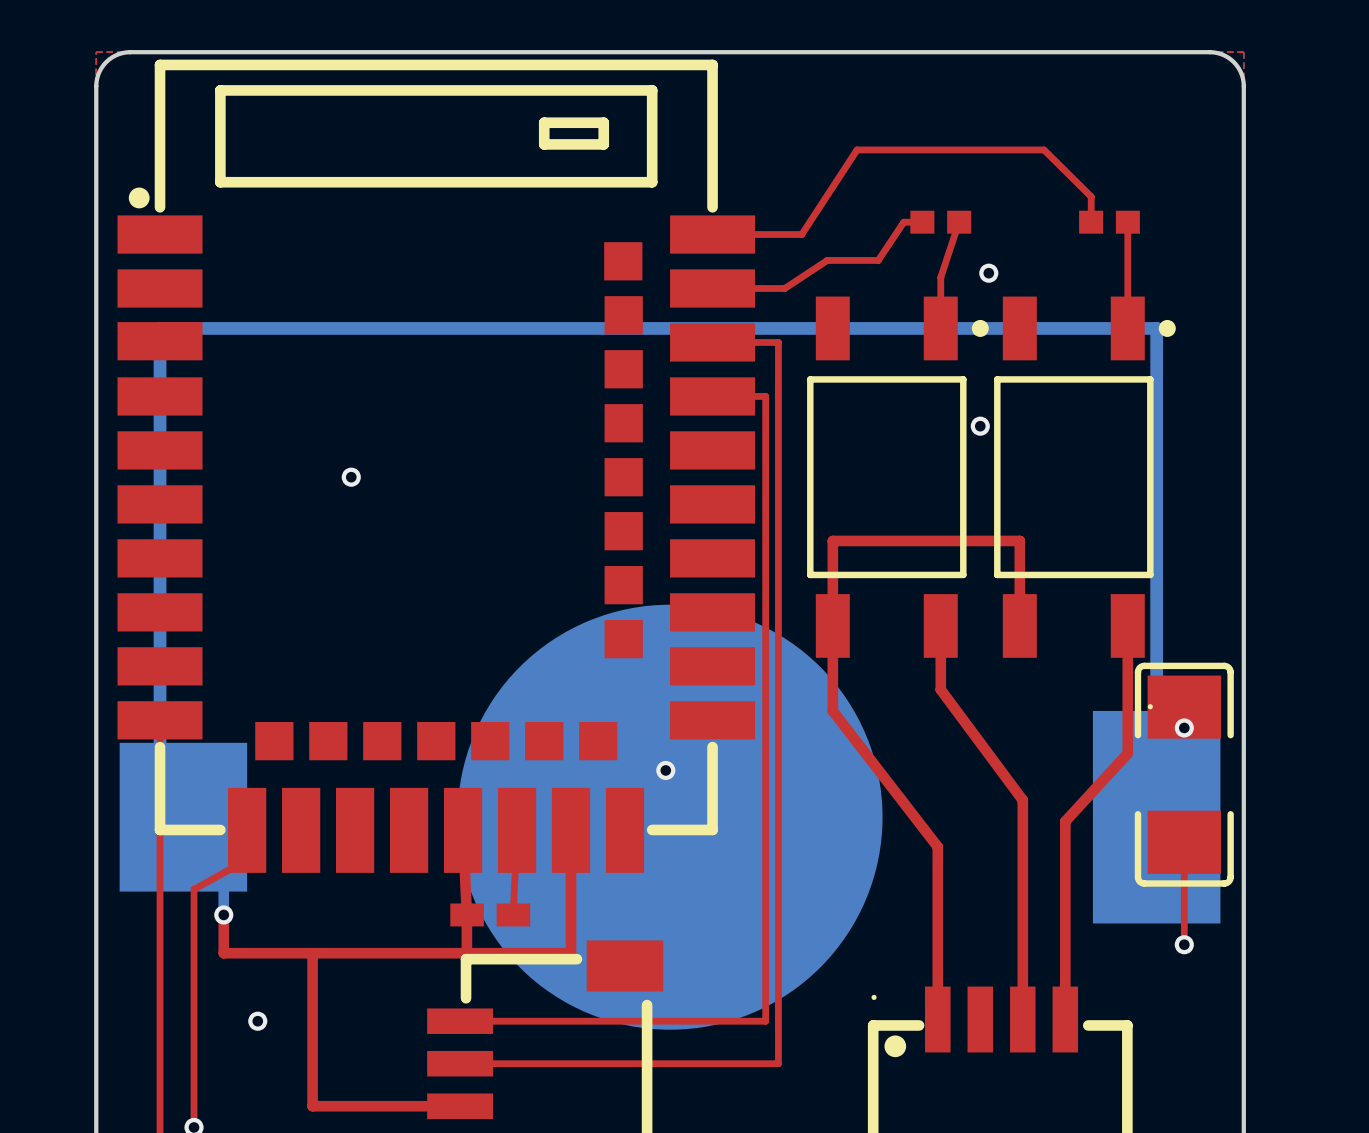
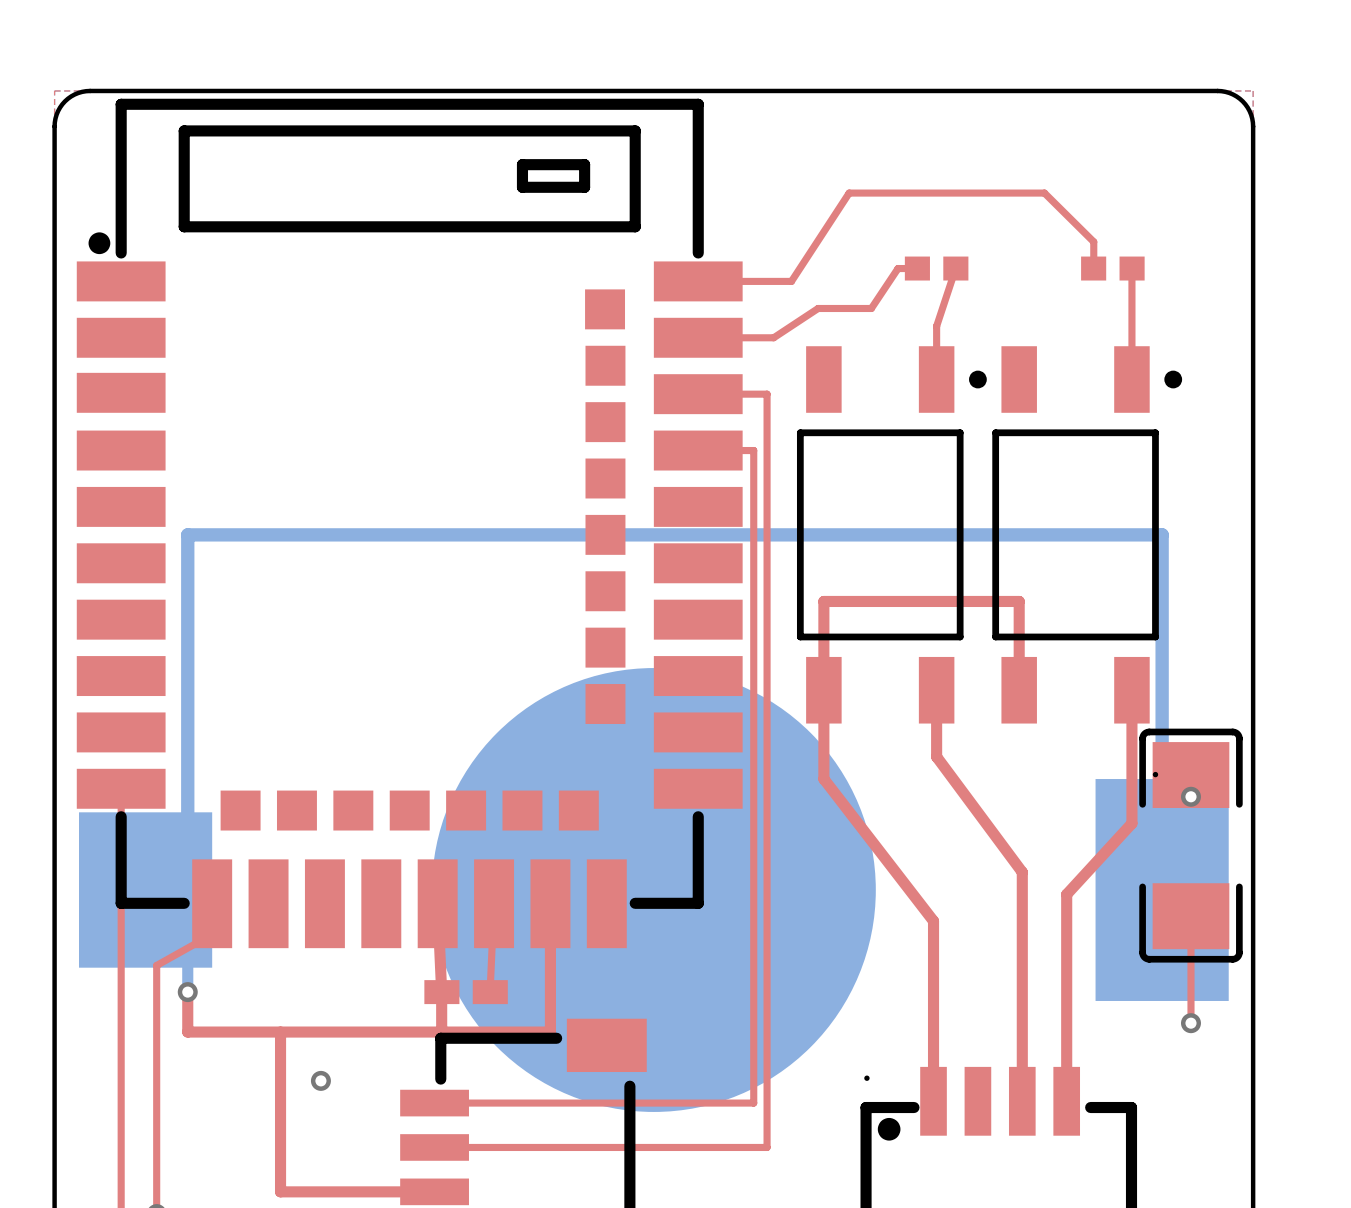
via: (988, 273) -> none
via: (980, 426) -> none
via: (351, 477) -> none
bottom track: (1156, 477) (1156, 328) (160, 328) (160, 774) -> (1162, 534) (187, 534) (187, 823)
via: (665, 770) -> none
via: none -> (320, 1080)
via: (257, 1021) -> none

